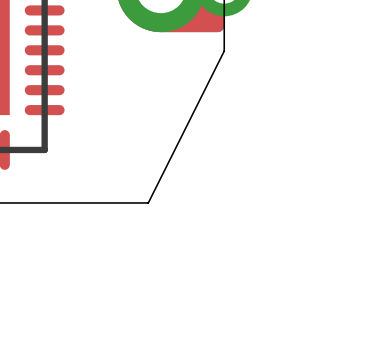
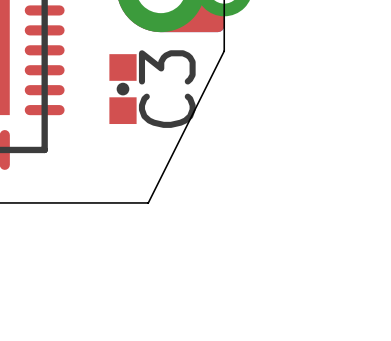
C3: none -> (122, 89)

